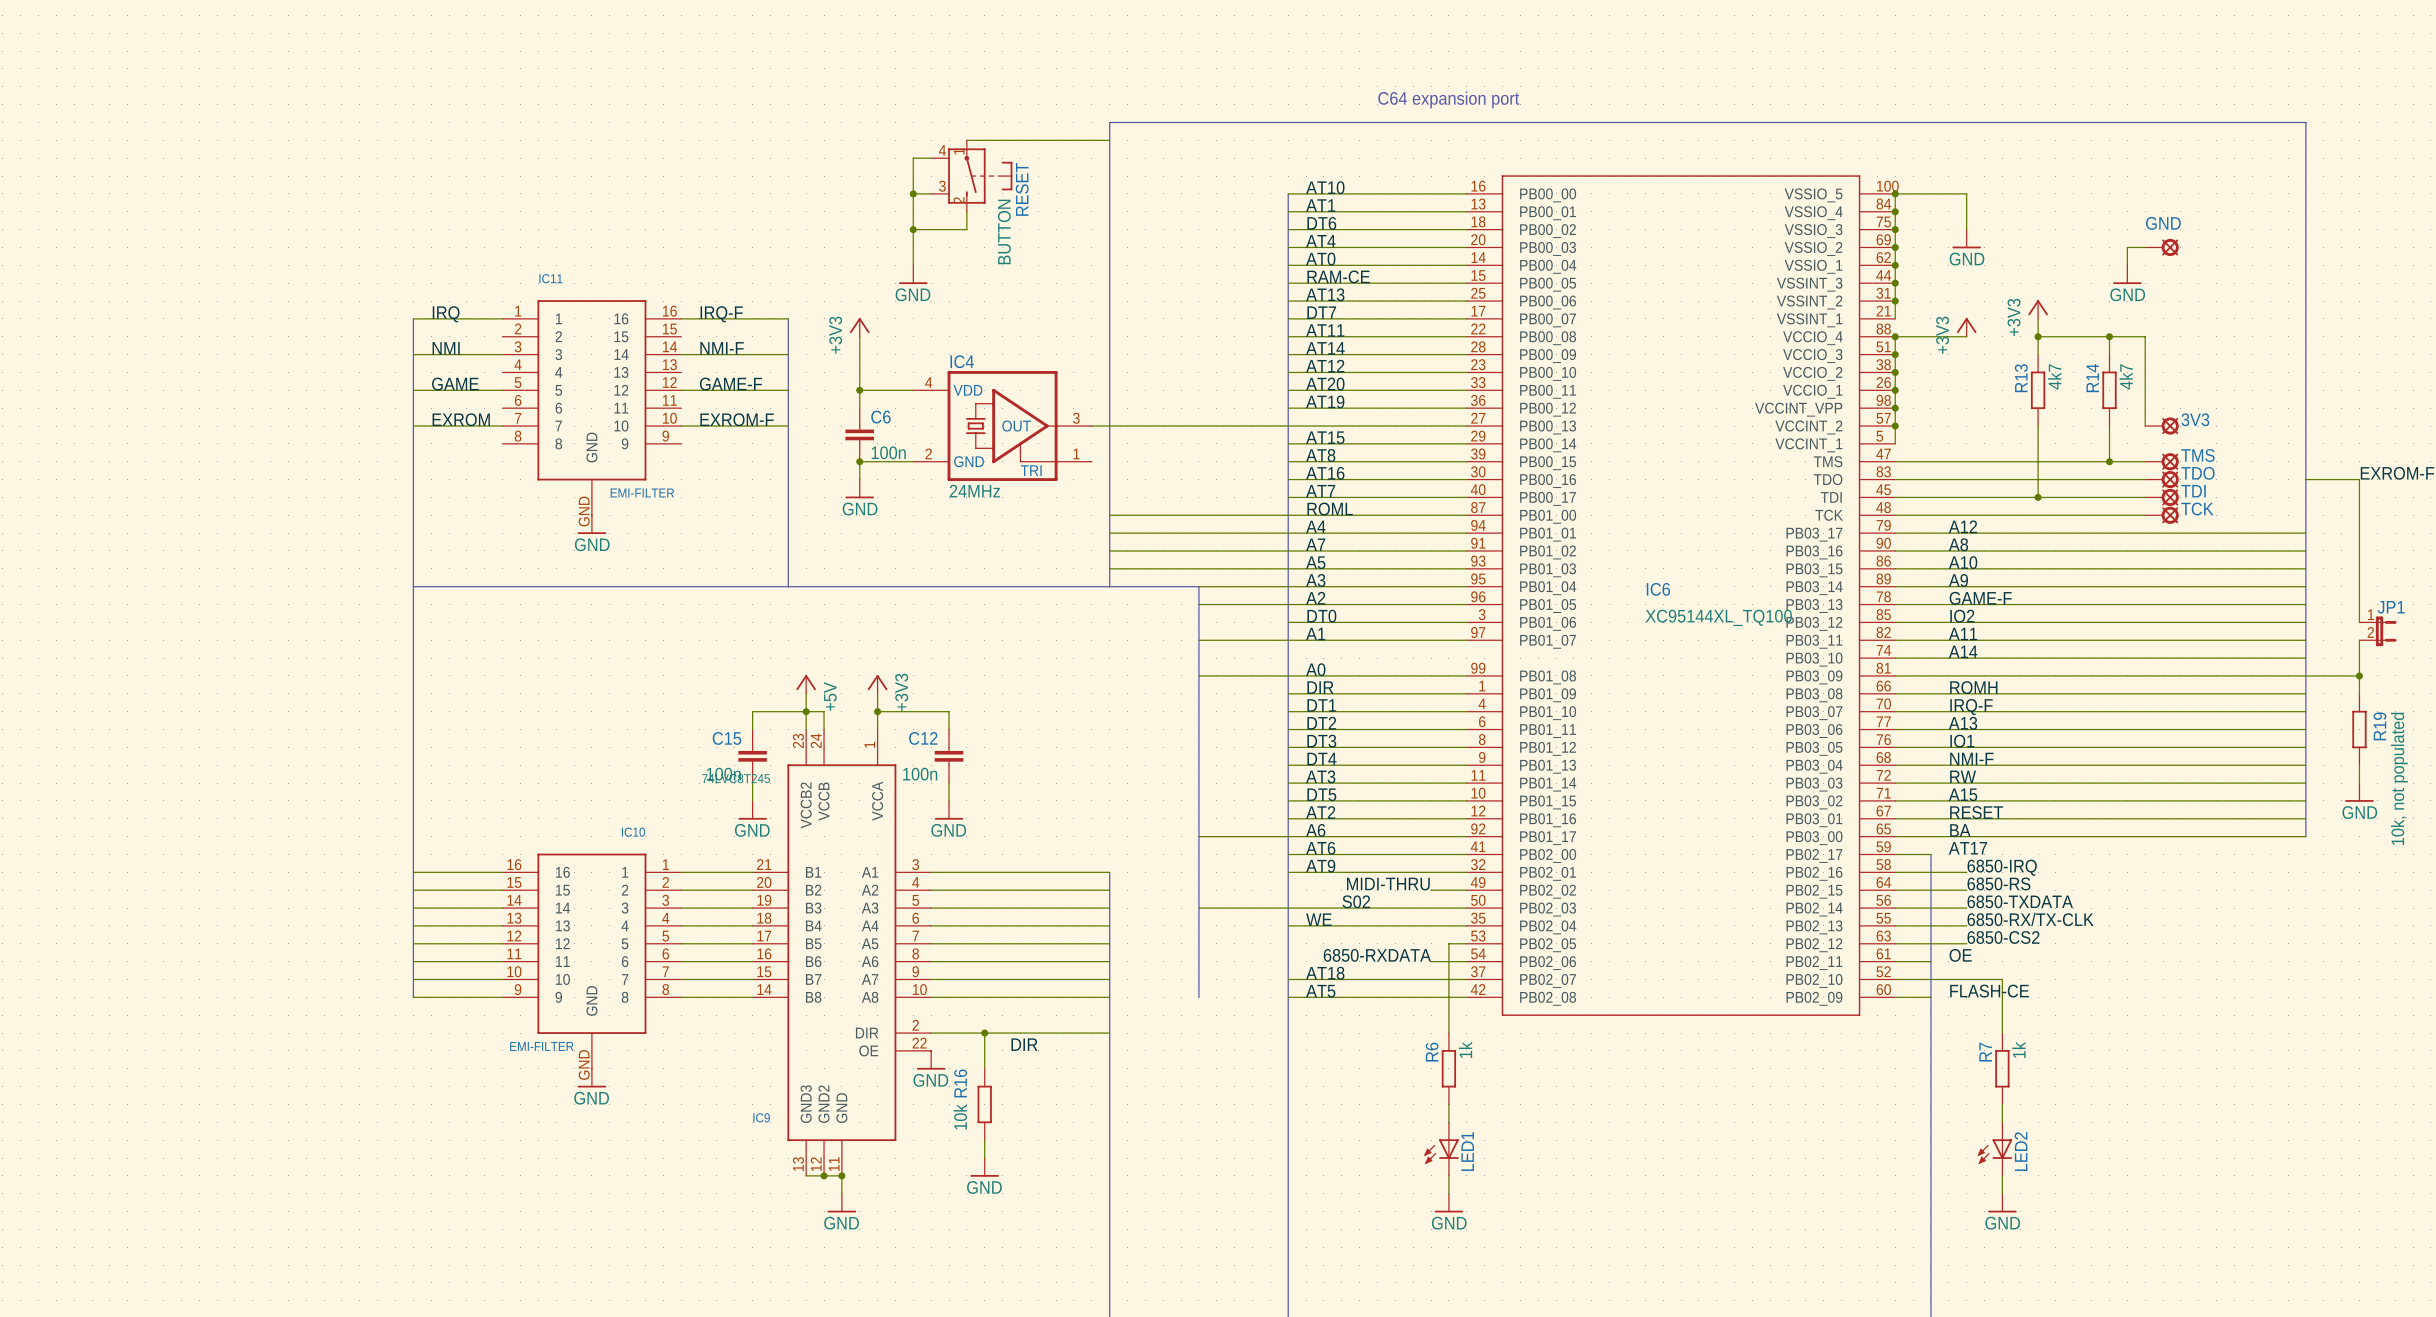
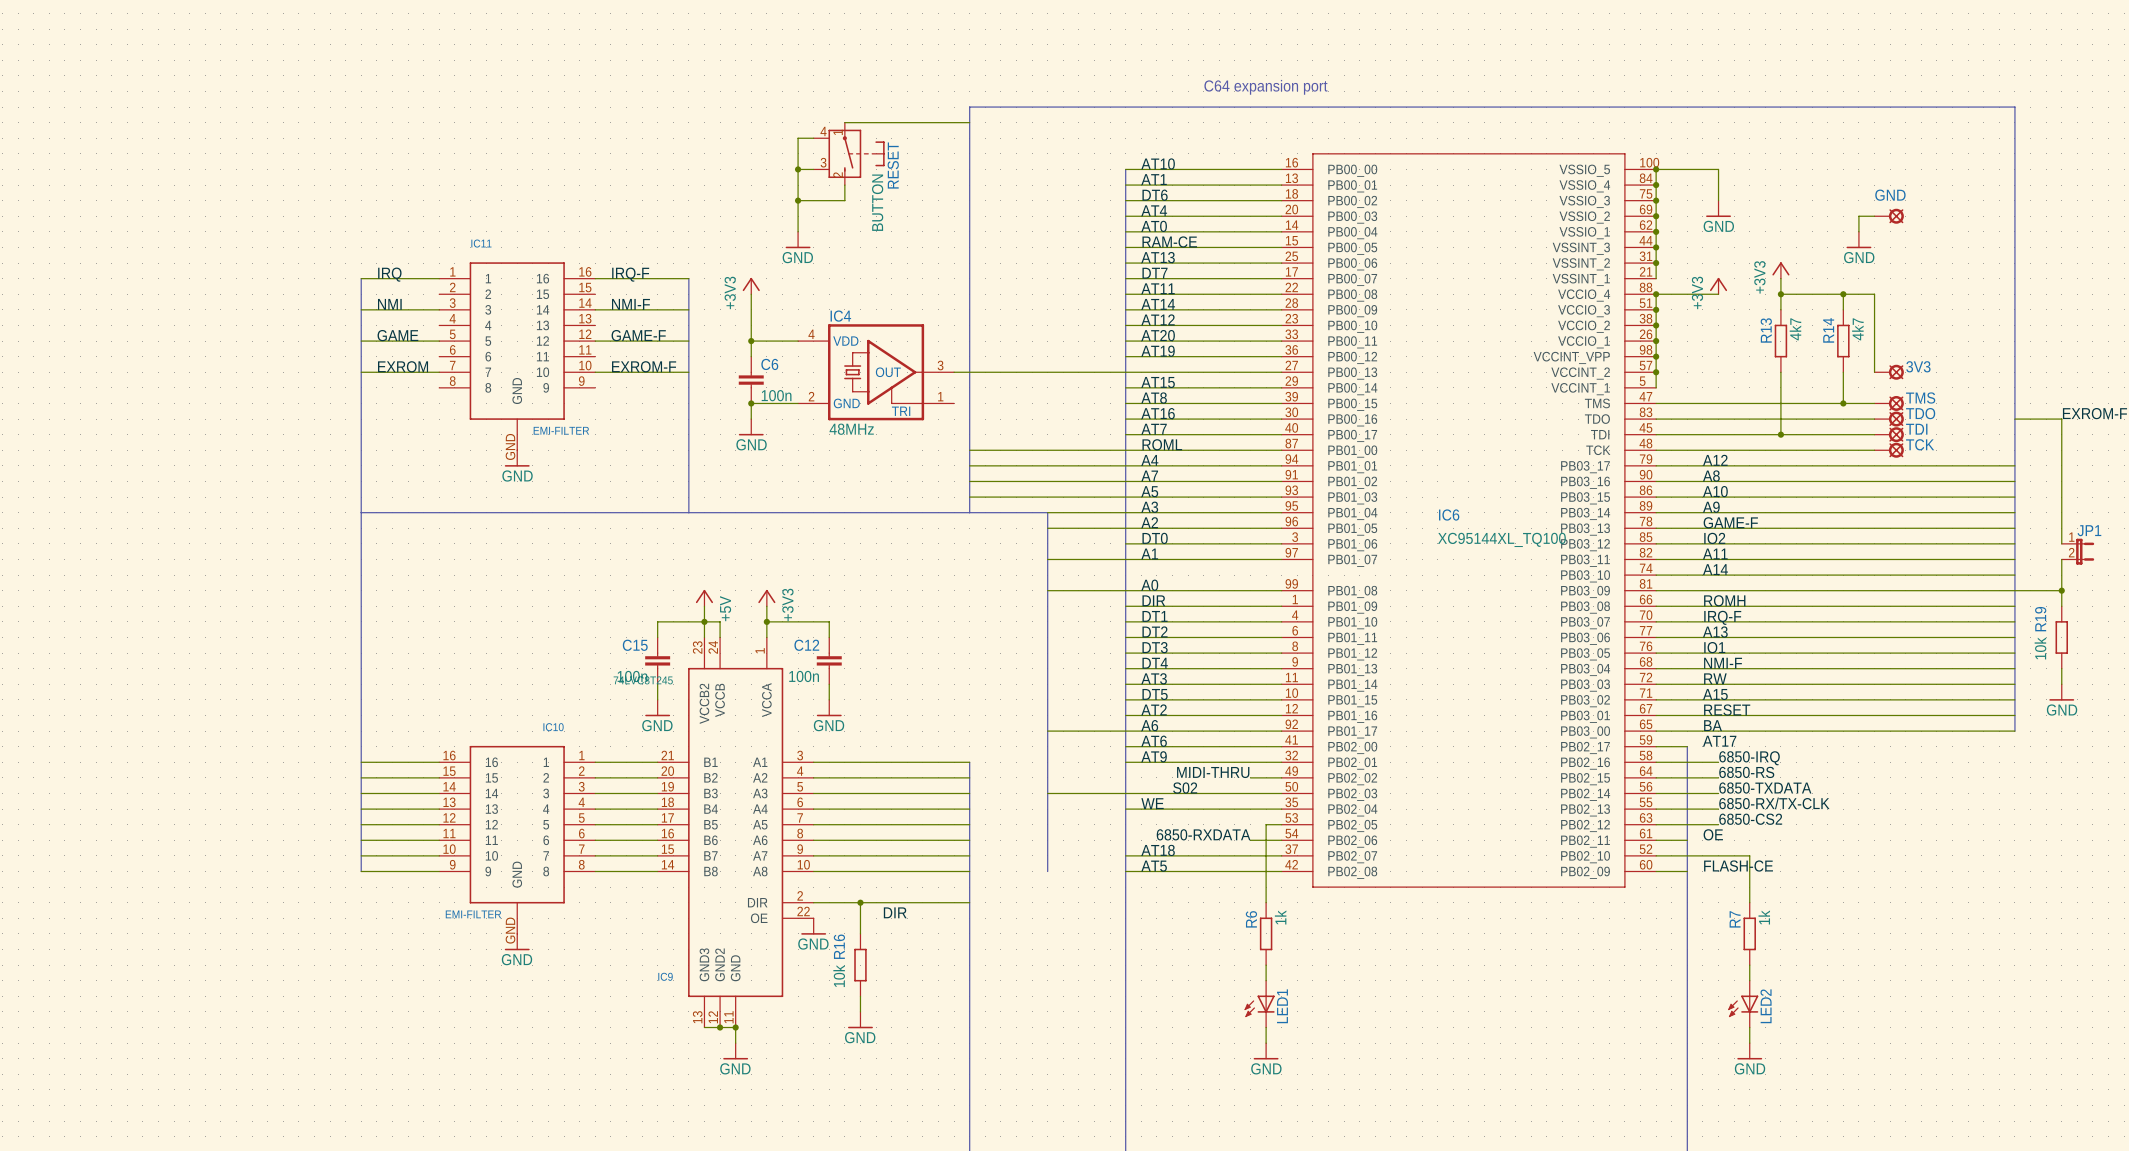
IC4 value: 24MHz (974, 491) -> 48MHz (851, 429)
R19 name position: R19 (2379, 726) -> R19 (2040, 619)
R19 value: 10k, not populated (2399, 778) -> 10k (2040, 648)

